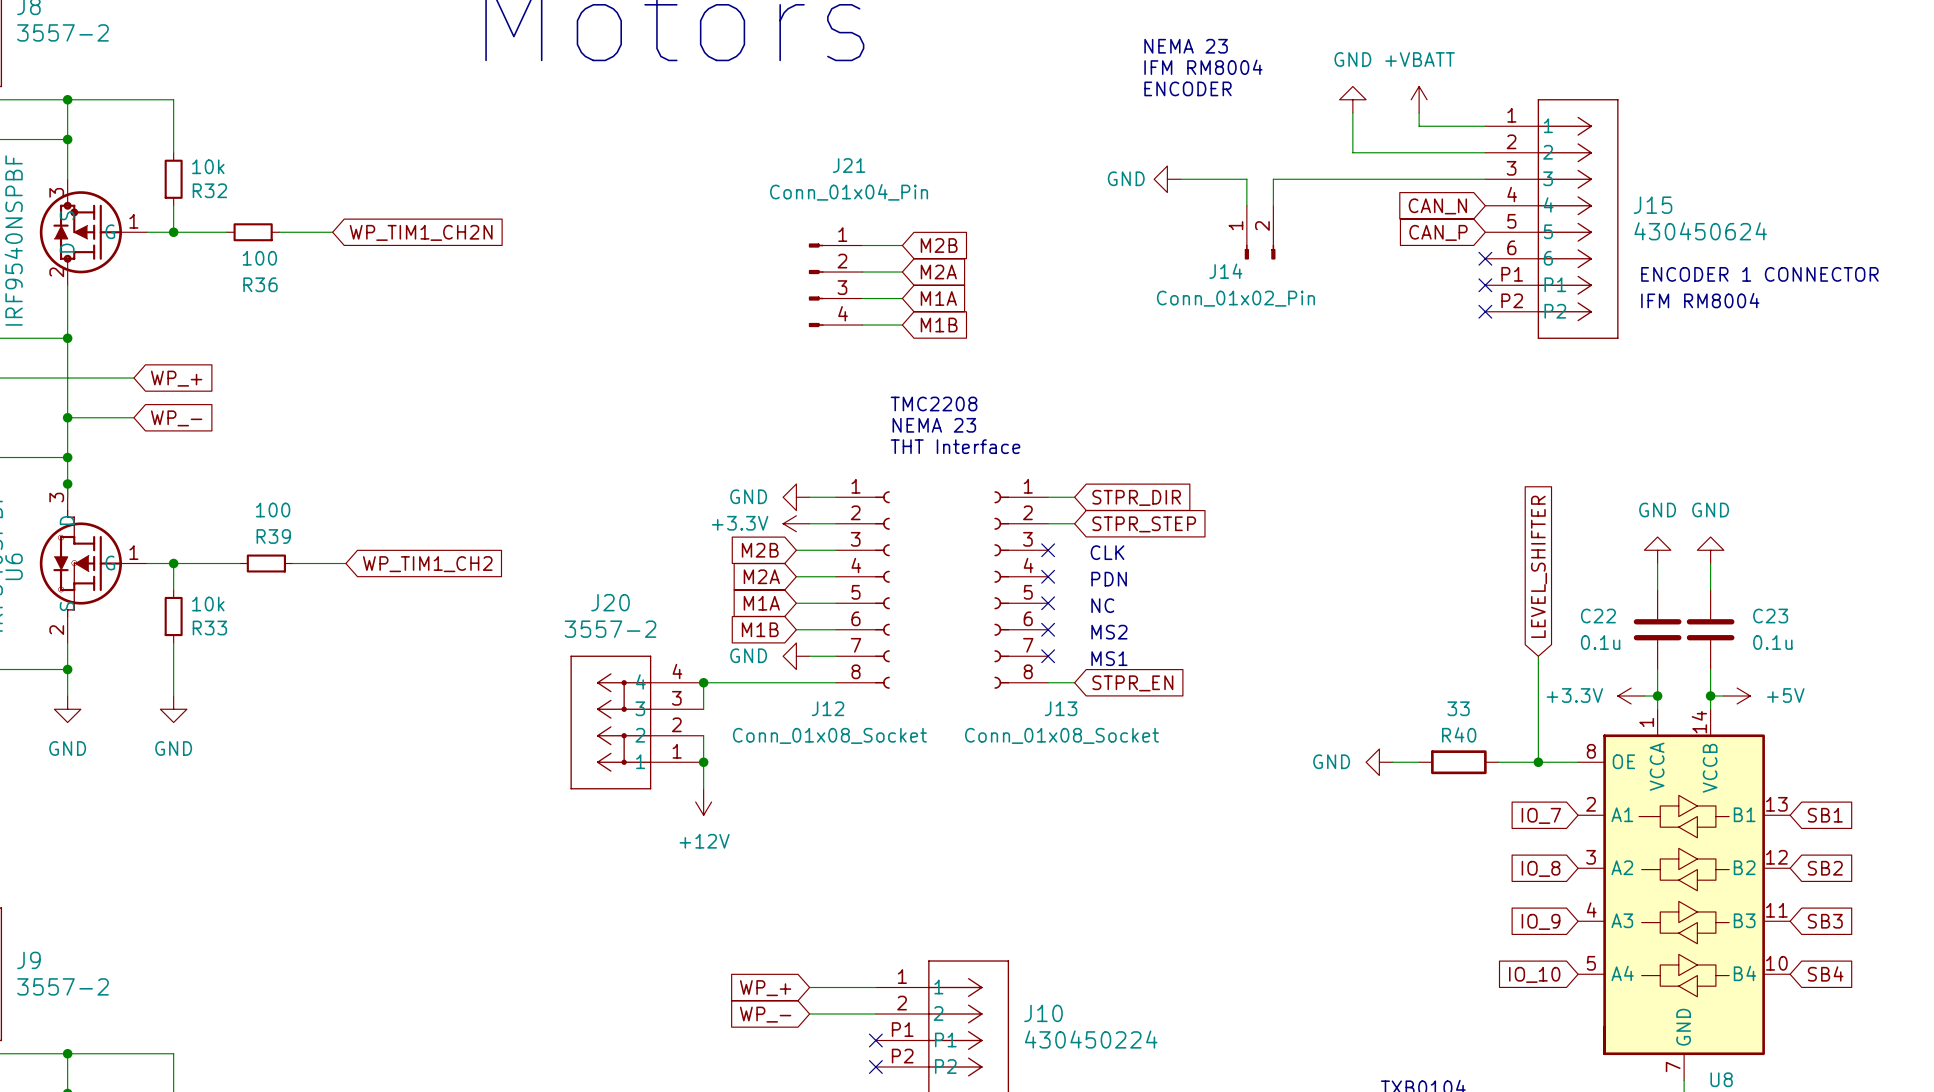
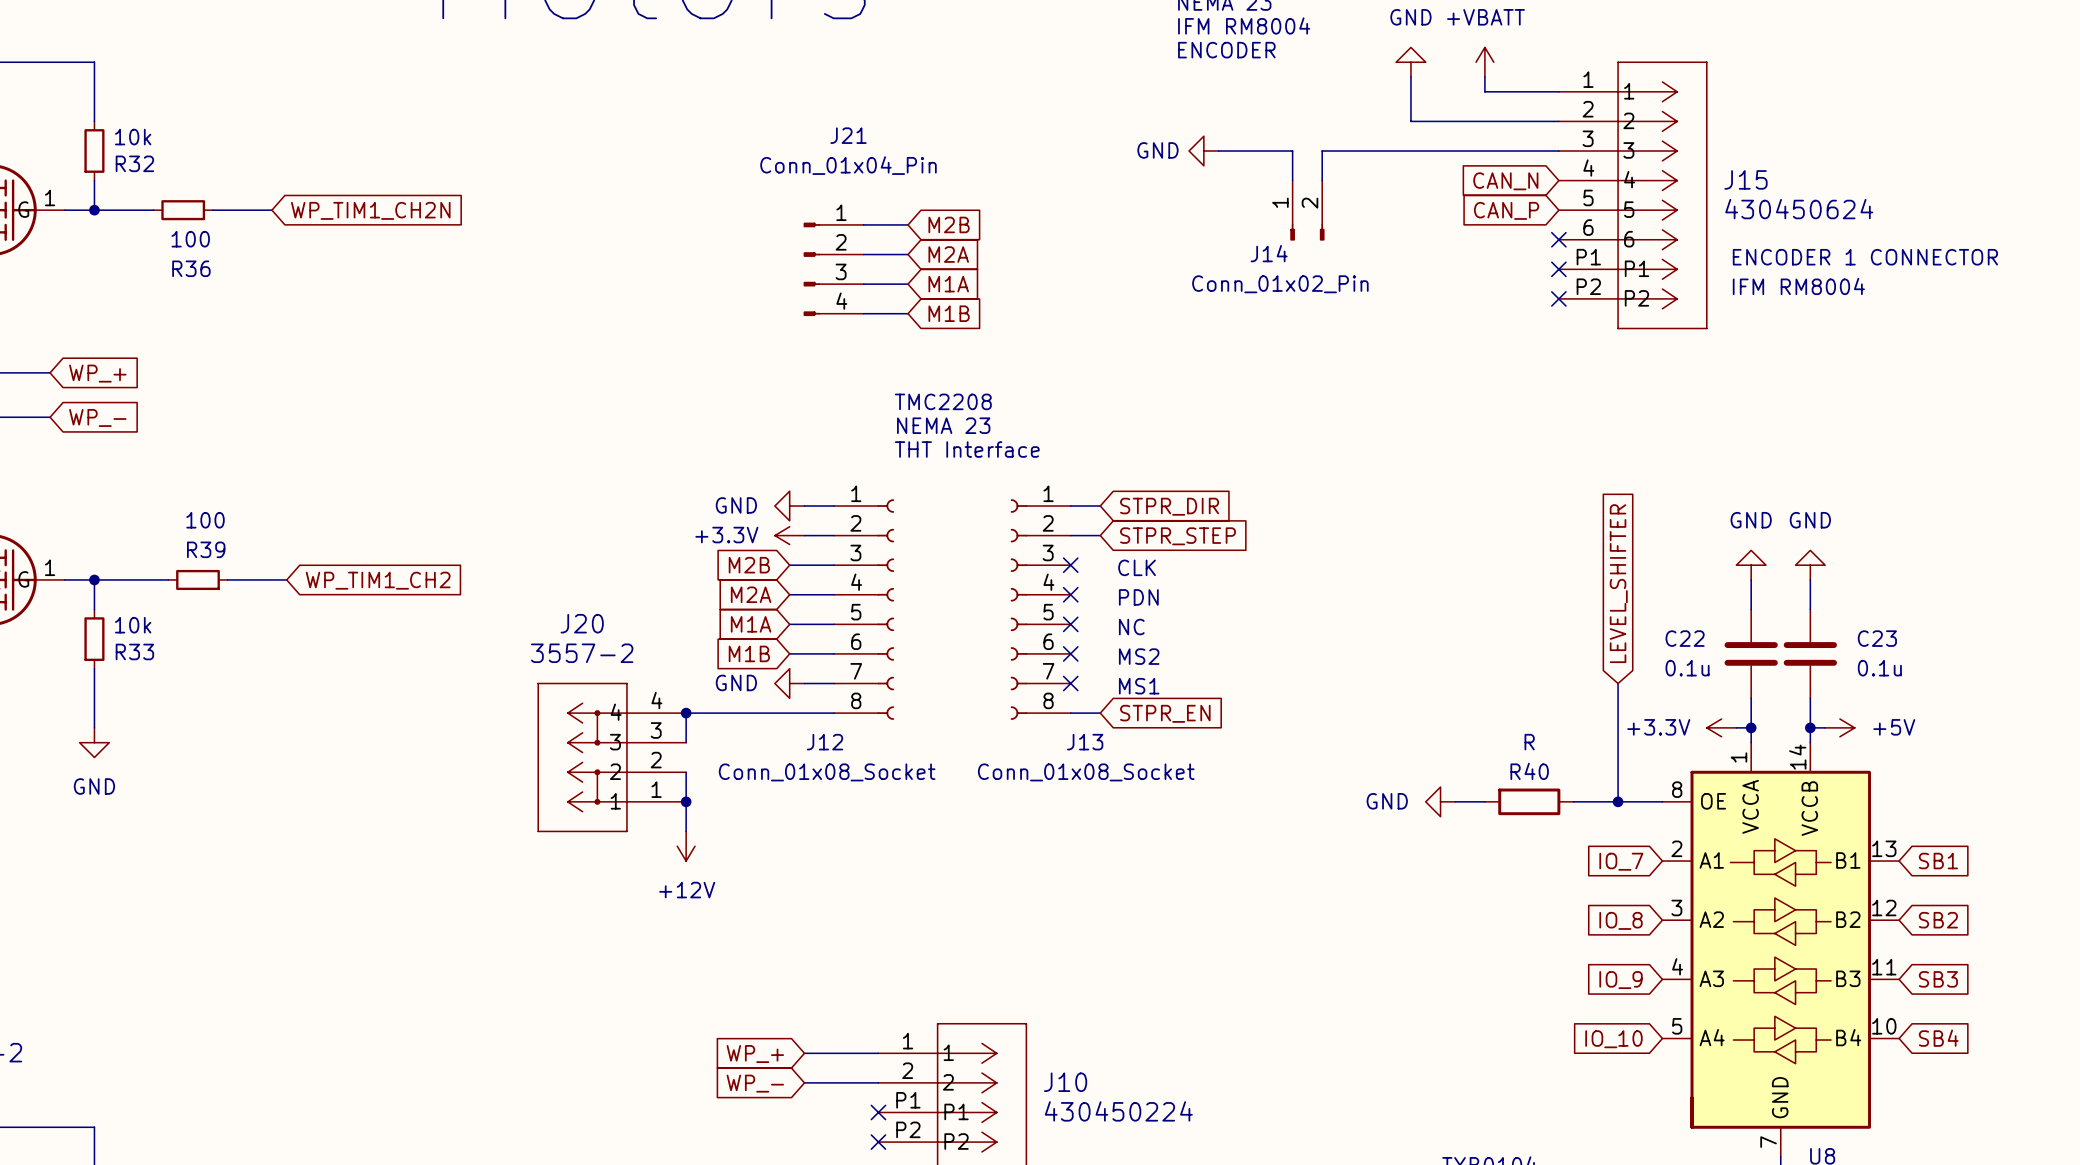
R40 value: 33 (1458, 708) -> R (1529, 742)

